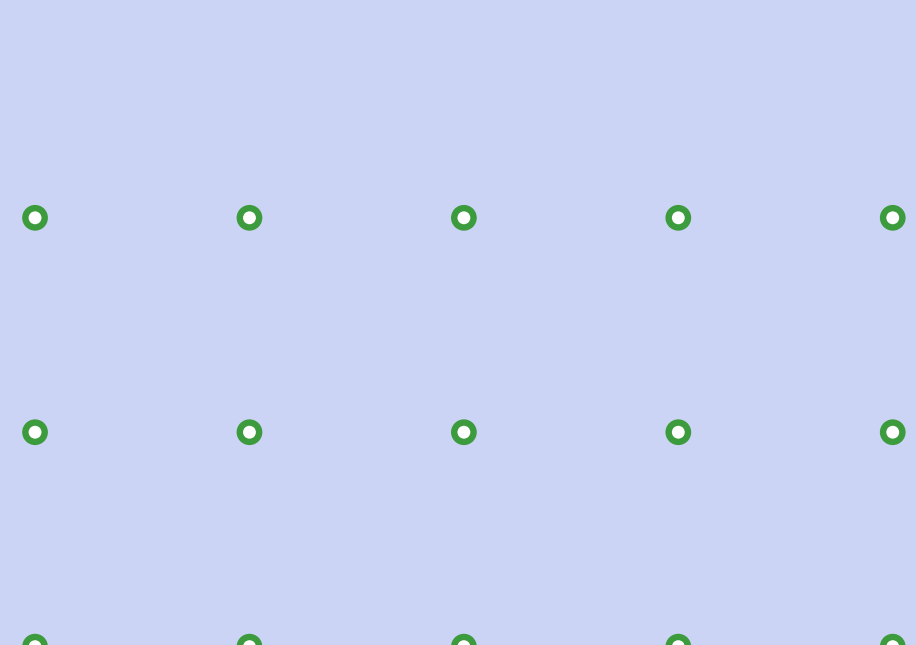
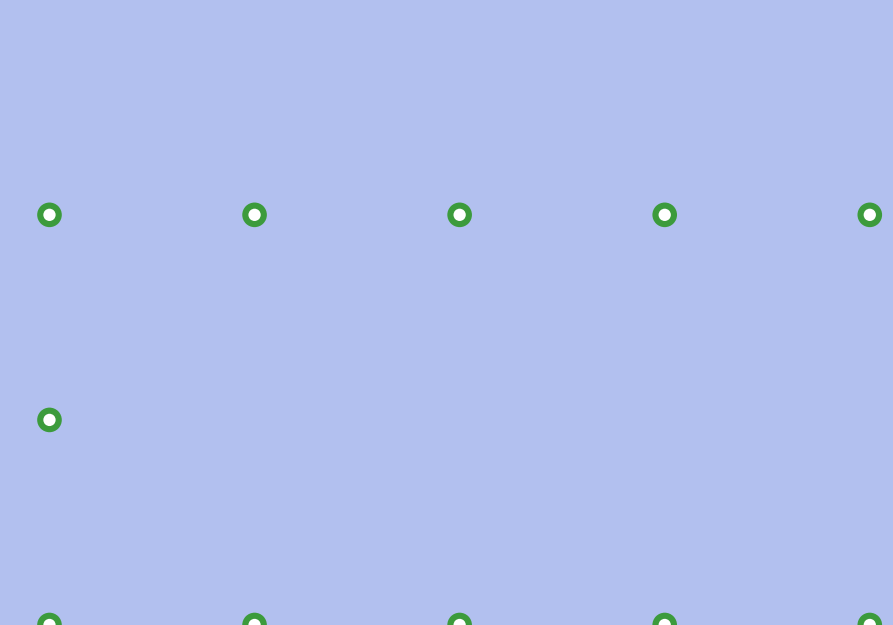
via: (249, 432) -> none
via: (463, 432) -> none
via: (678, 432) -> none
via: (892, 432) -> none

